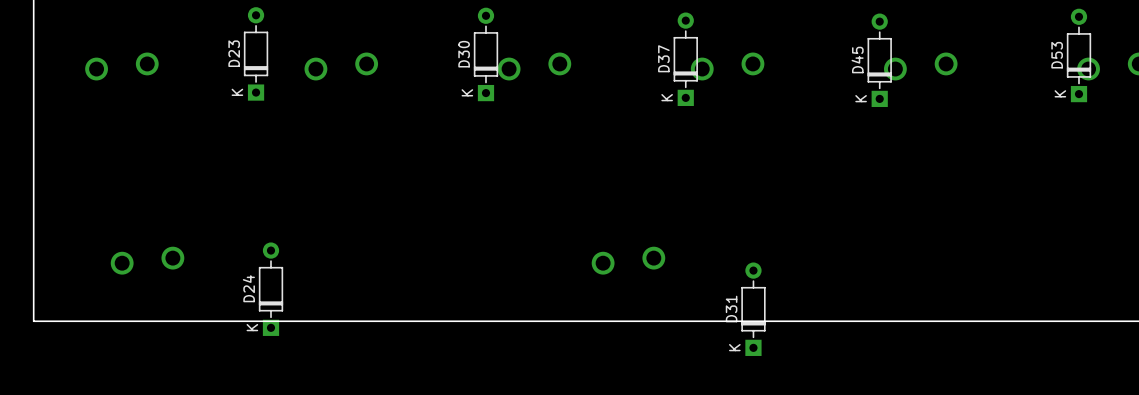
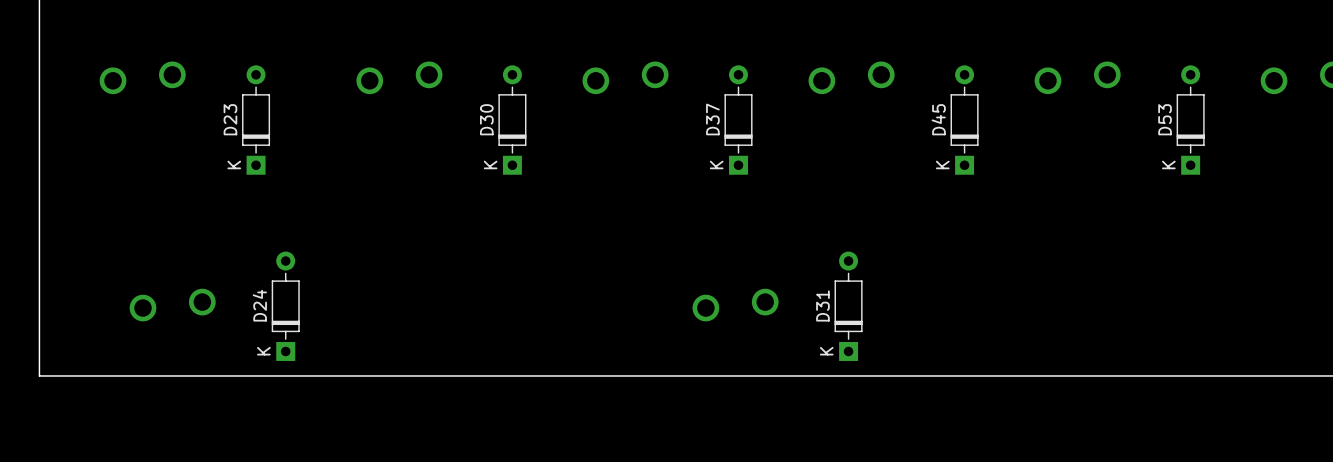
D23 position: (256, 53) -> (256, 120)
D30 position: (485, 54) -> (512, 120)
D53 position: (1078, 55) -> (1190, 120)
D37 position: (685, 59) -> (738, 120)
D45 position: (879, 60) -> (964, 120)
D24 position: (271, 289) -> (285, 306)
D31 position: (753, 309) -> (848, 306)

